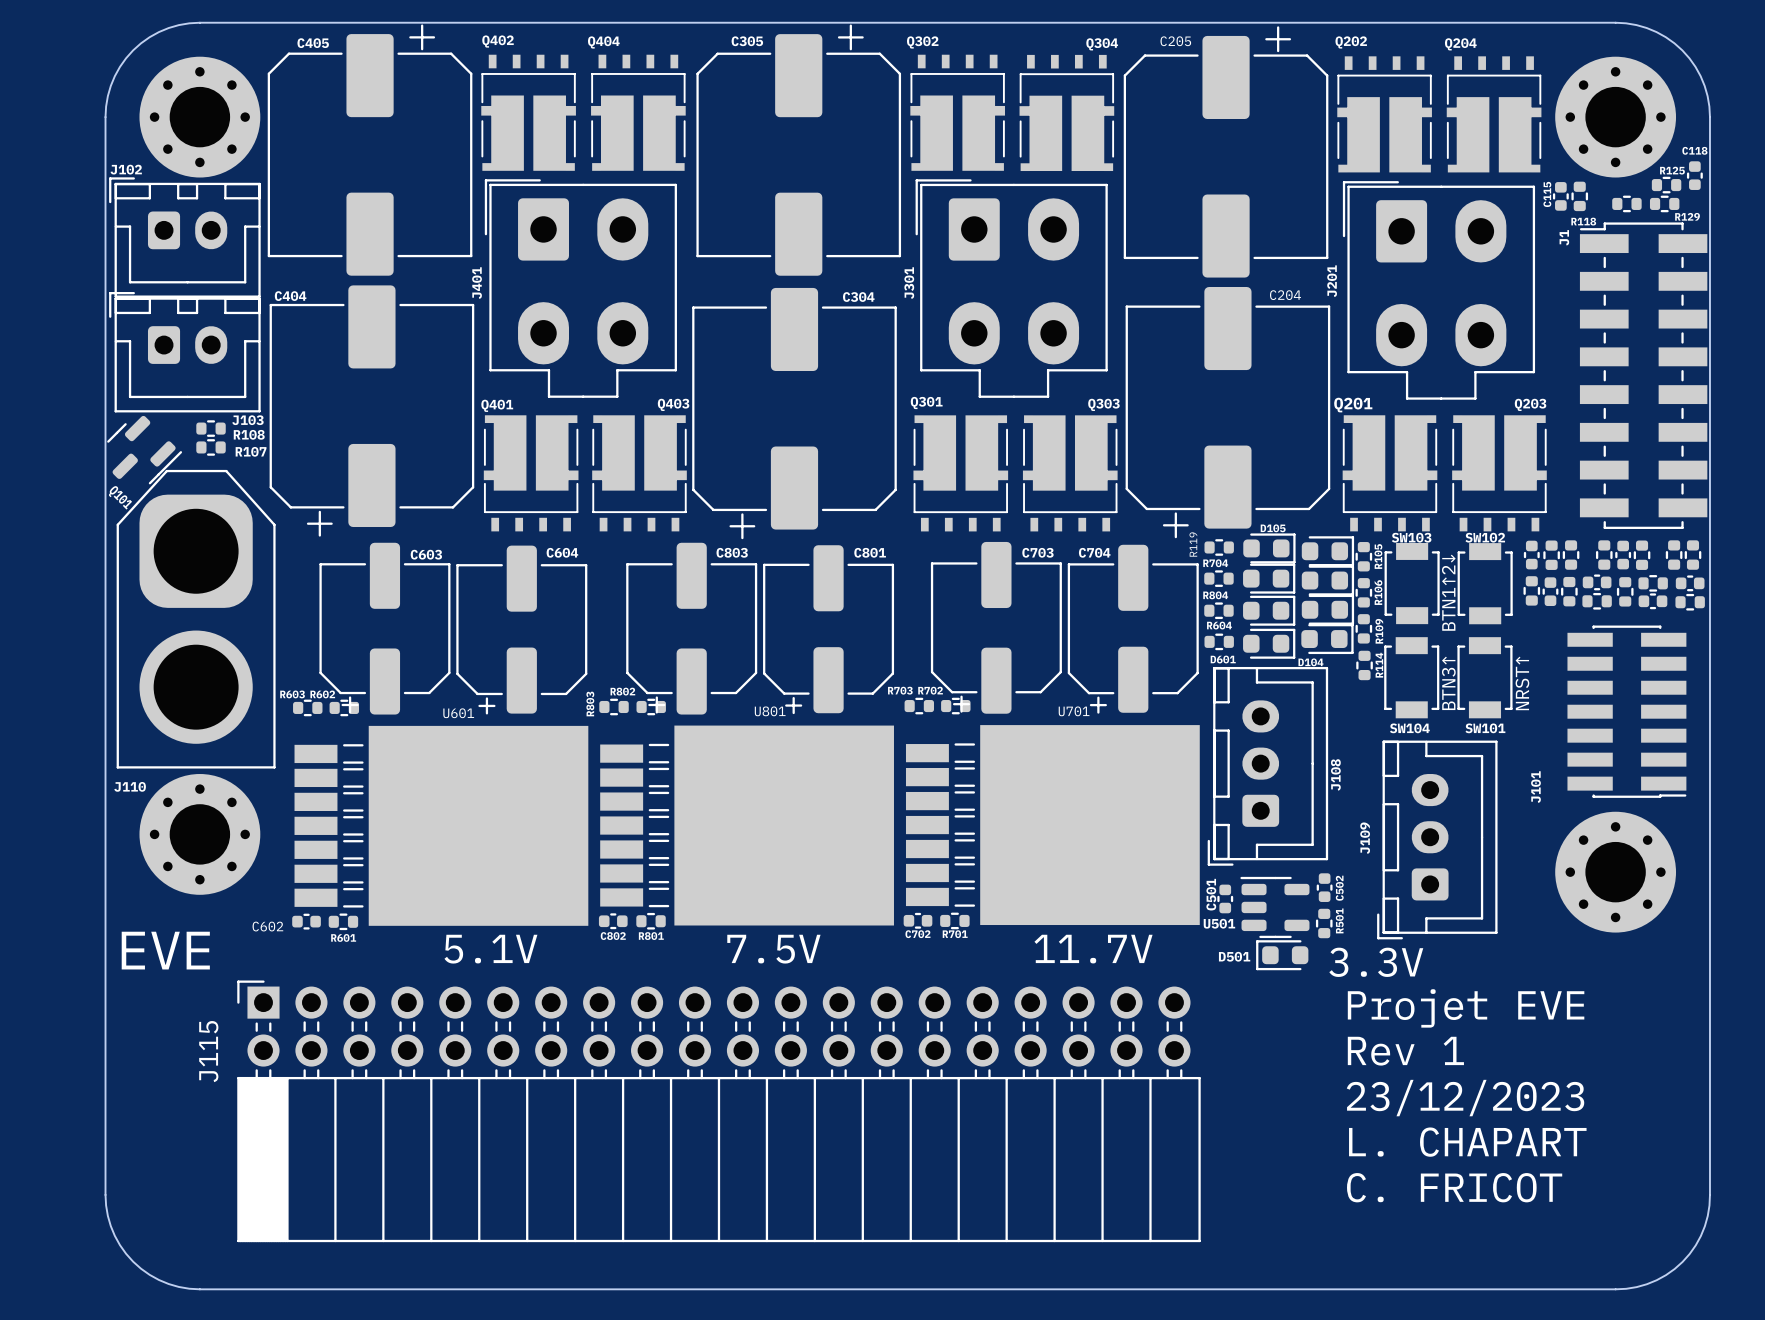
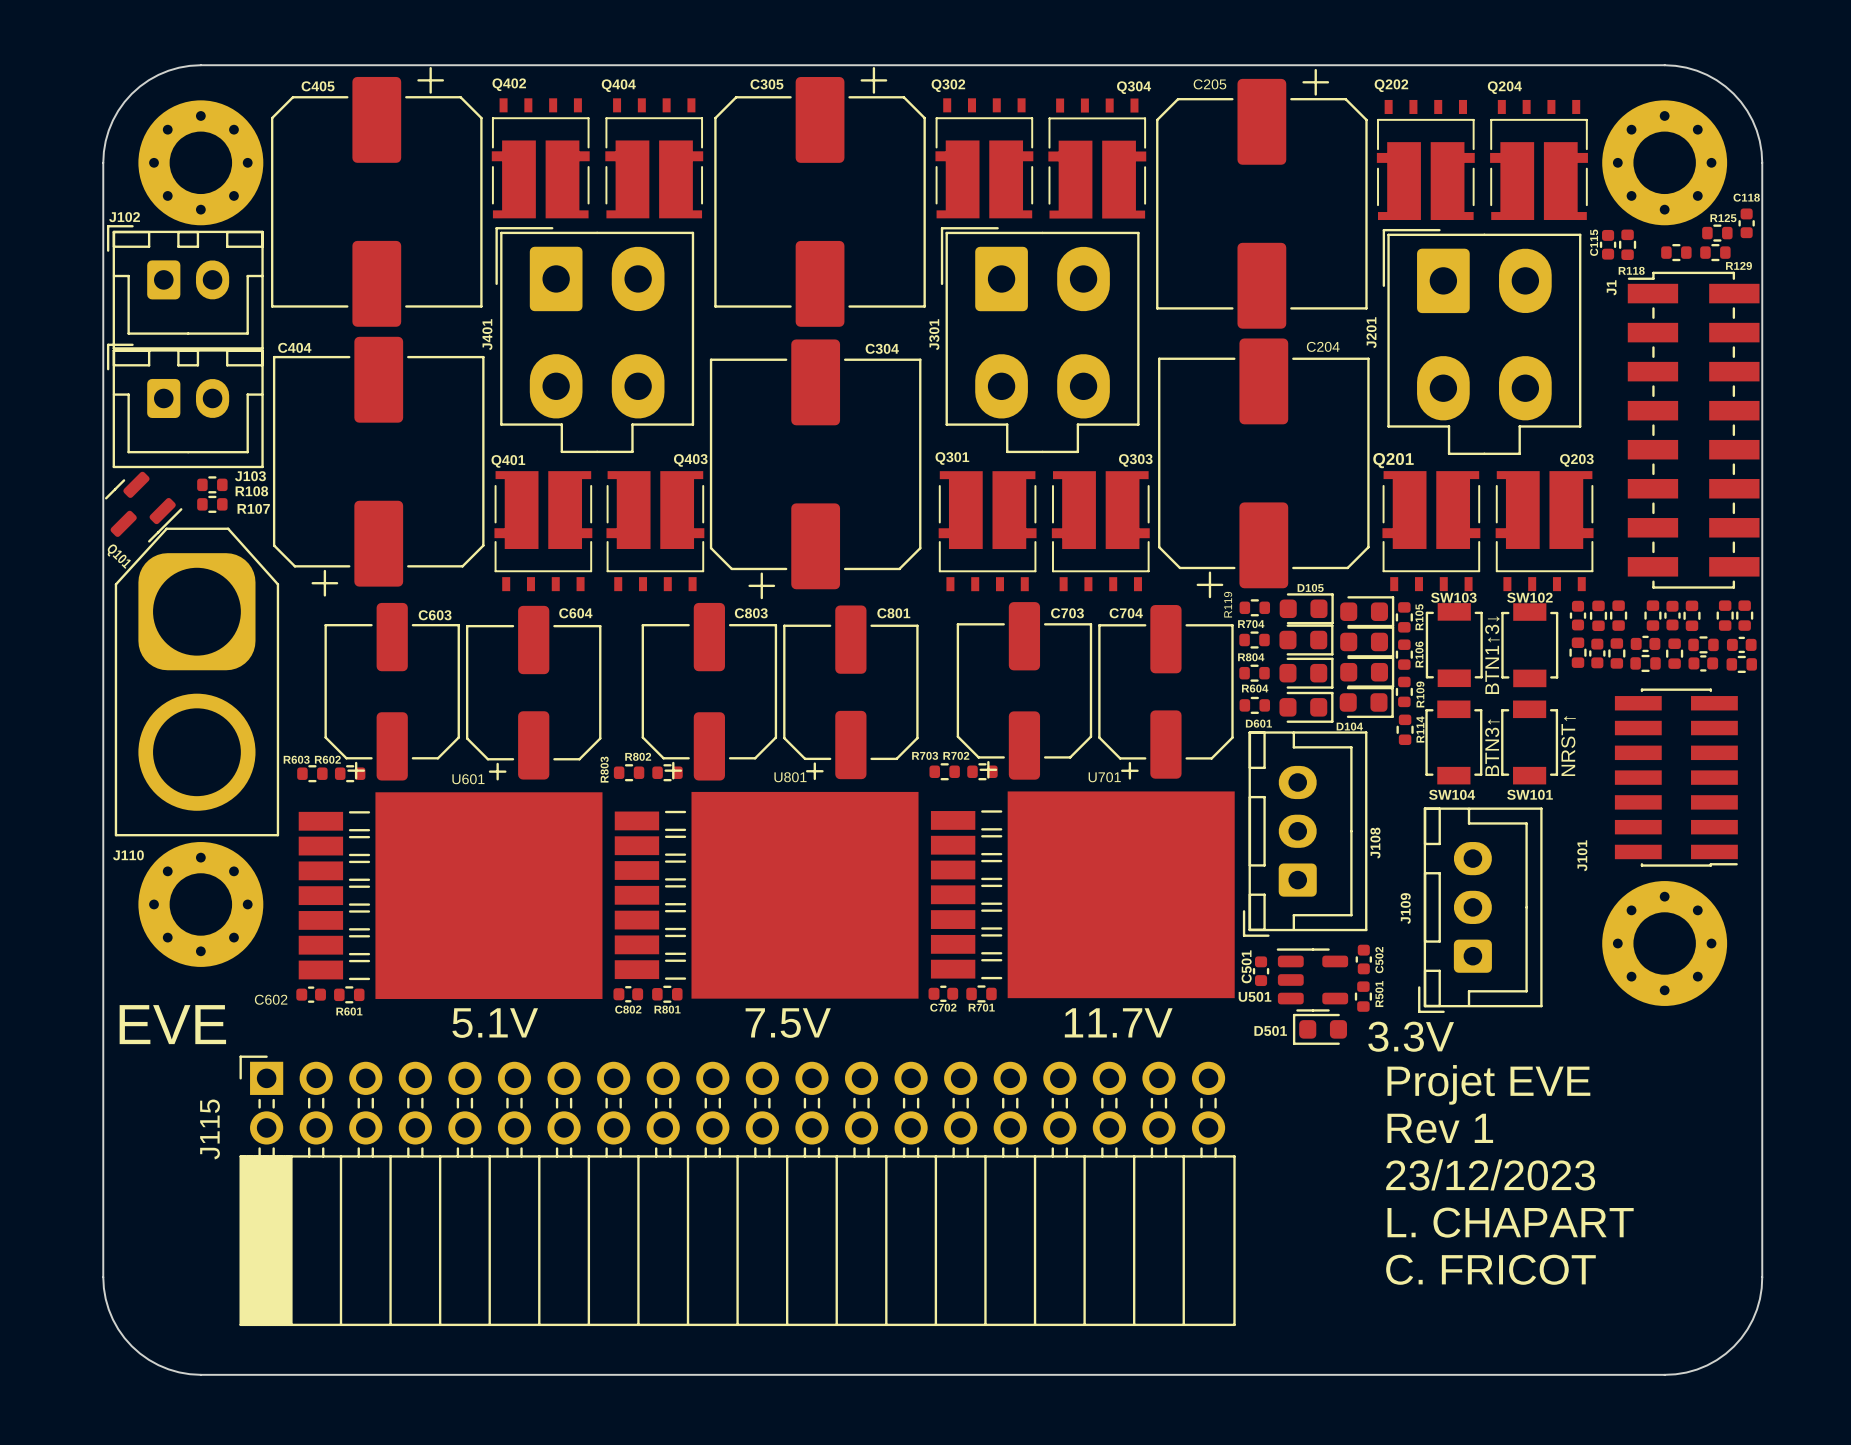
text: BTN1↑2↓ (1448, 592) -> BTN1↑3↓ (1492, 655)

